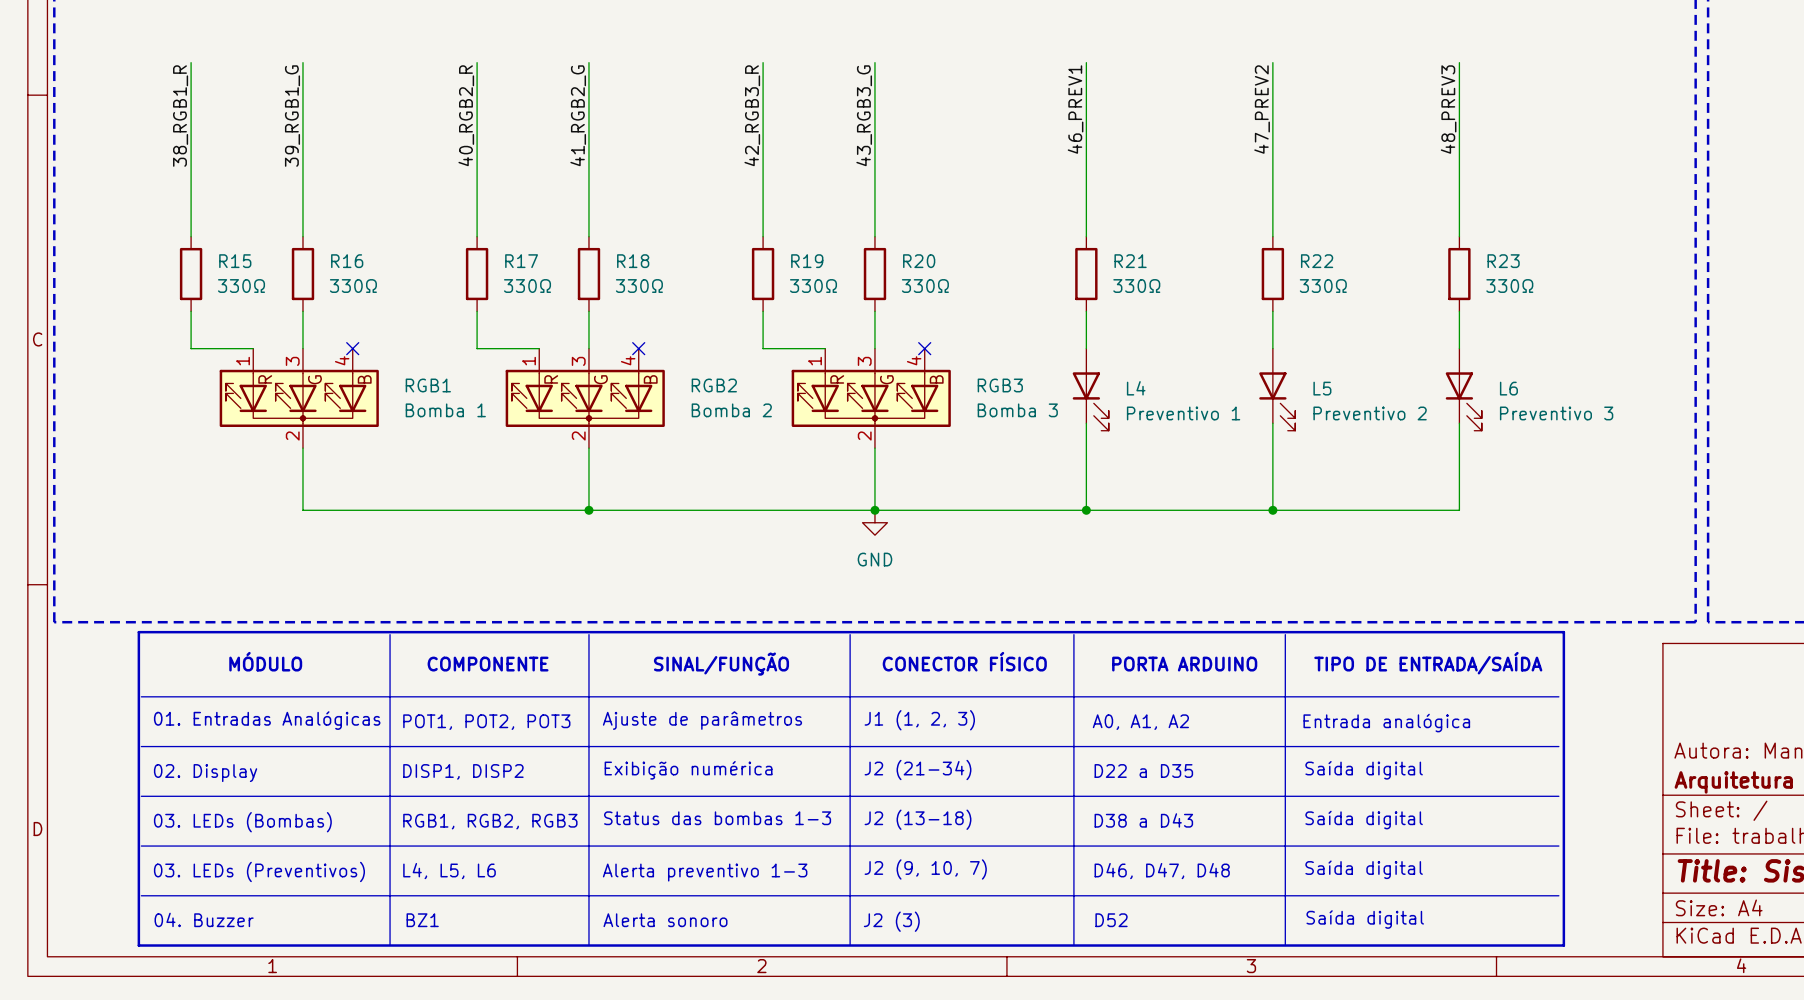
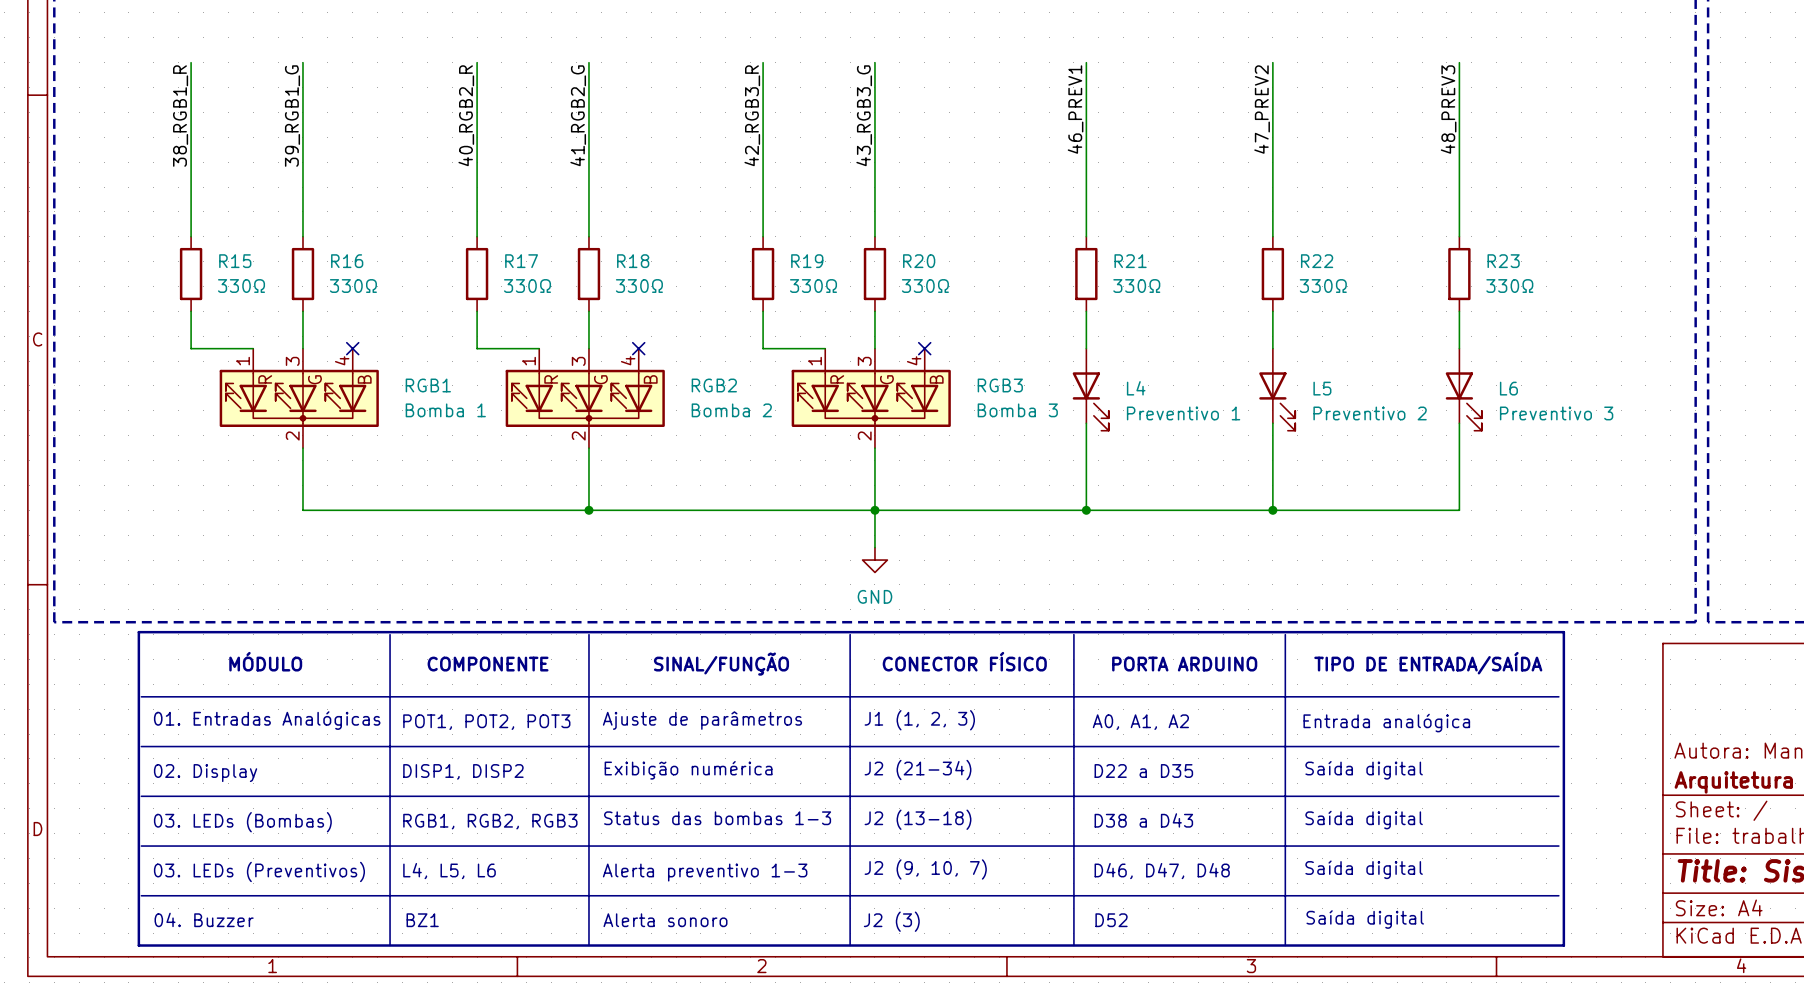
wire: none -> (874, 510) (874, 547)
power symbol position: GND (874, 522) -> GND (874, 560)

